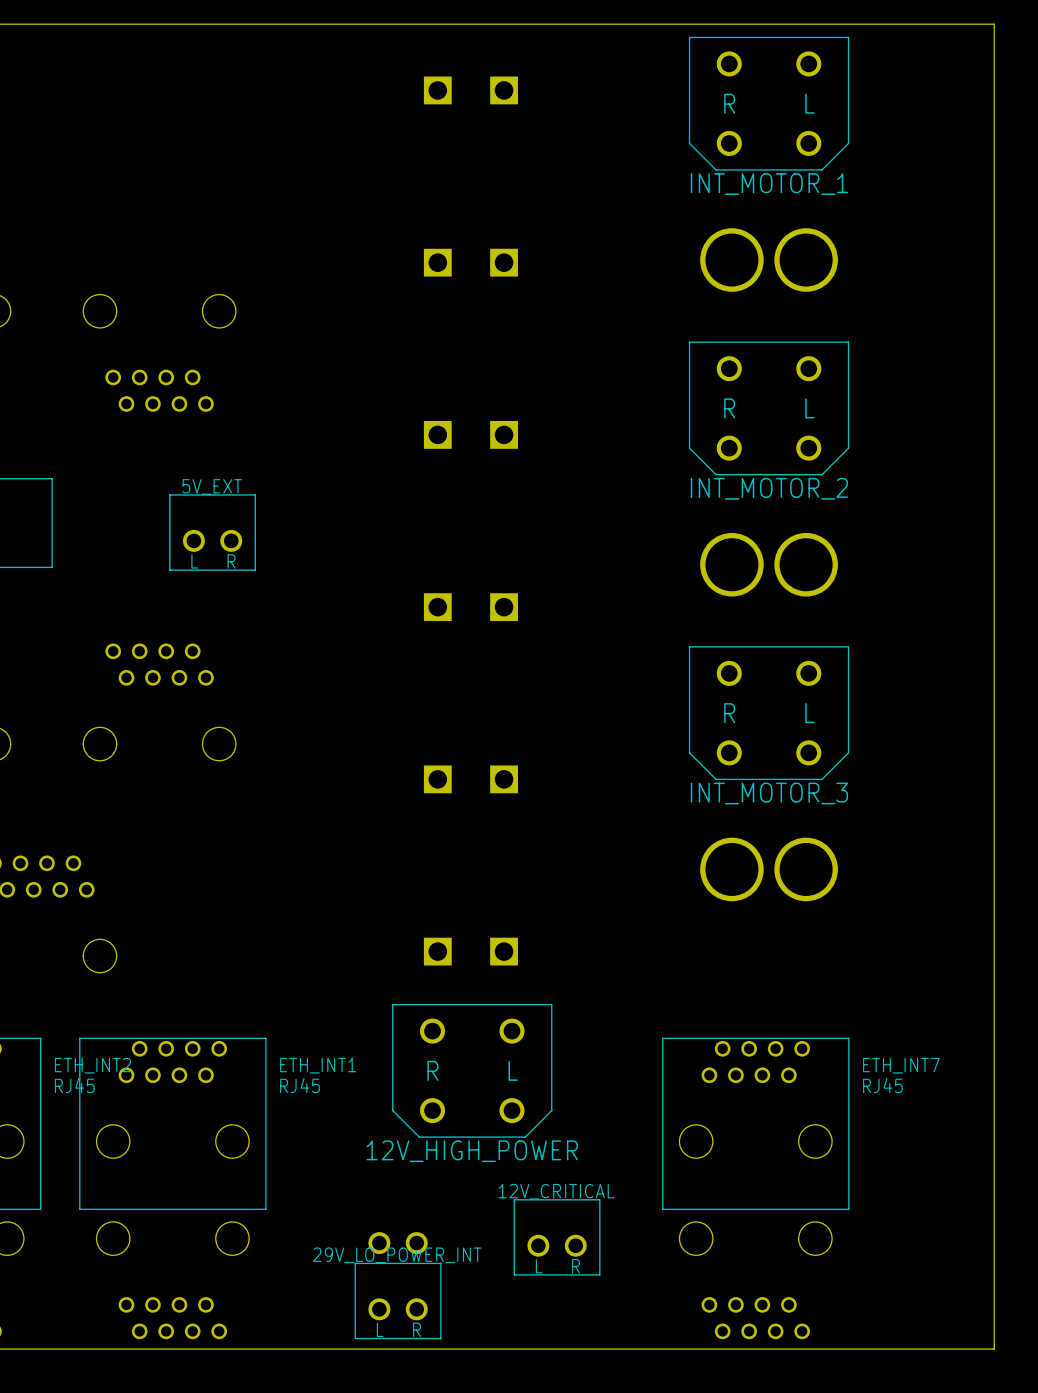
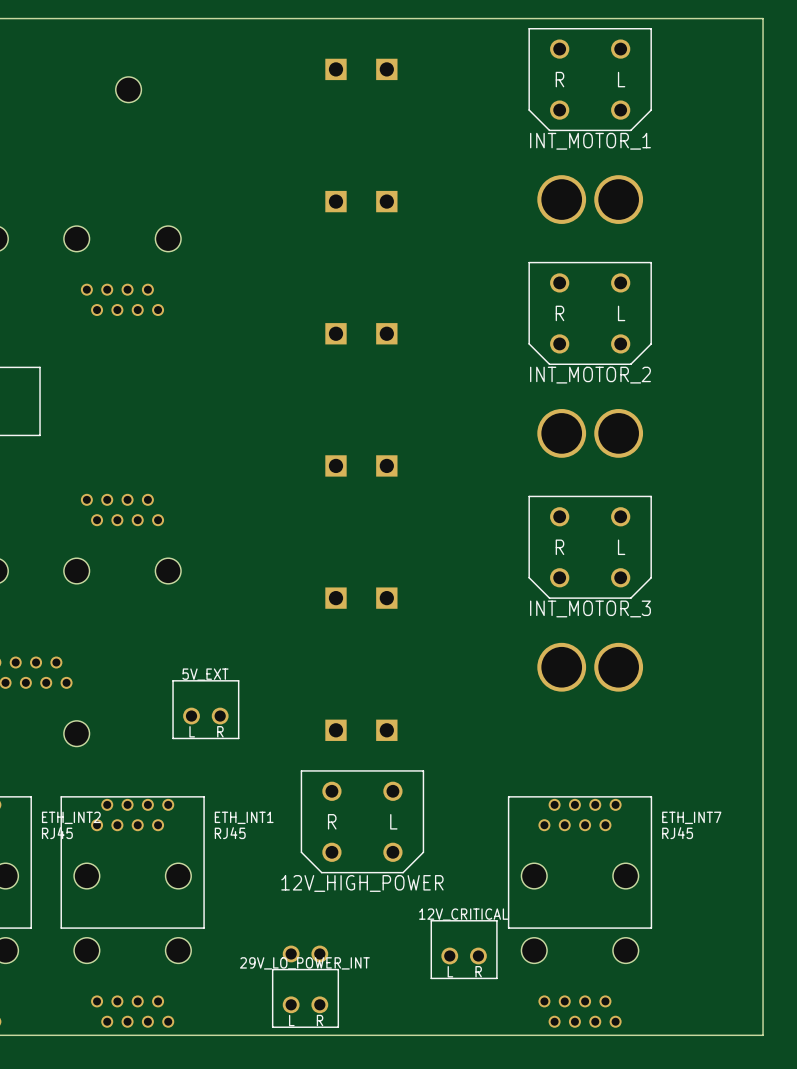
part: none -> (128, 89)
5V_EXT position: (212, 532) -> (205, 709)
12V_CRITICAL position: (557, 1237) -> (464, 949)

